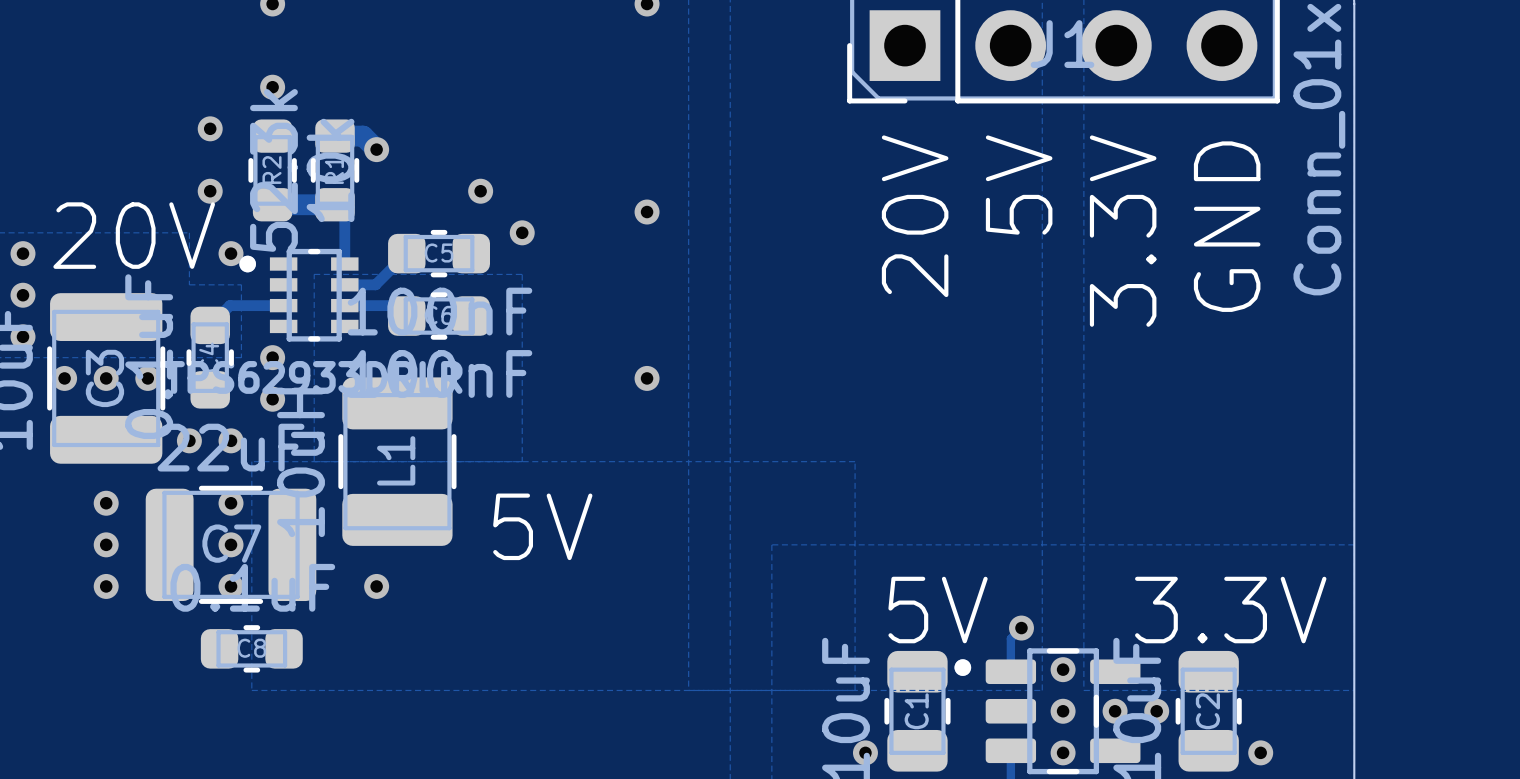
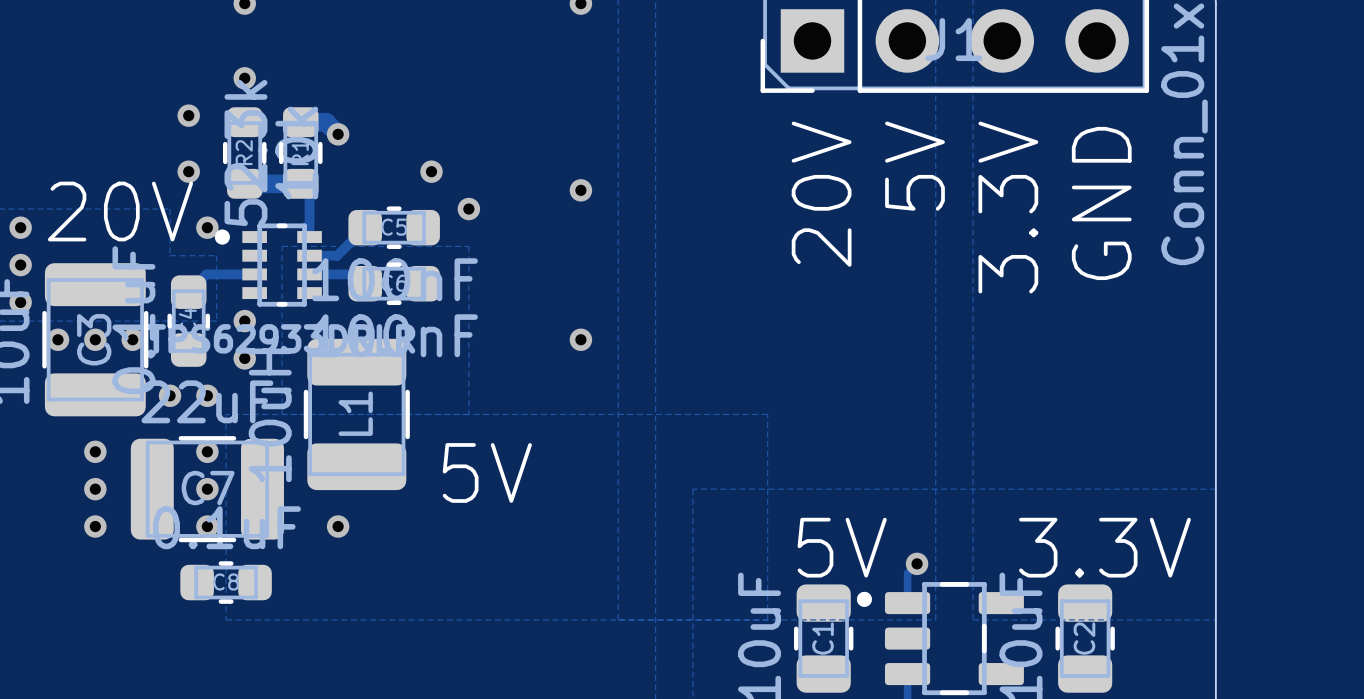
via: (1063, 669) -> none
via: (1063, 711) -> none
via: (1115, 711) -> none
via: (1156, 711) -> none
via: (865, 752) -> none
via: (1063, 752) -> none
via: (1260, 752) -> none

